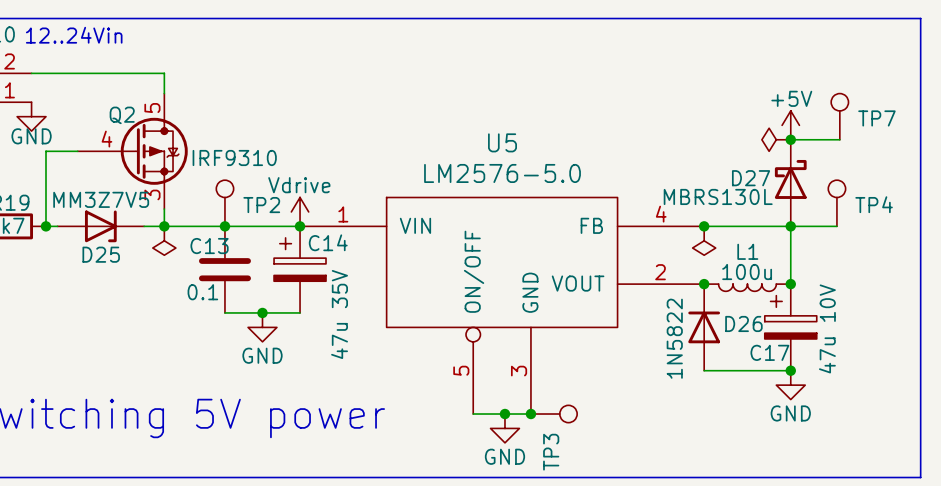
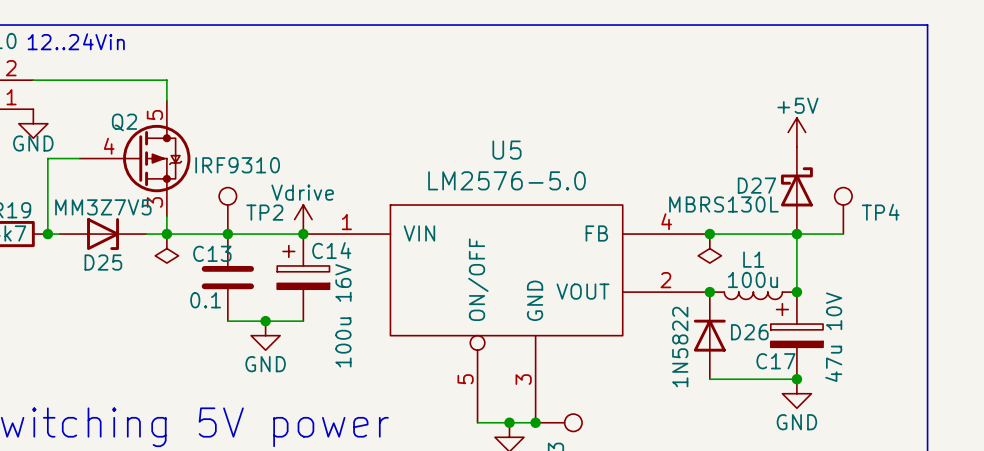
TP7: (839, 116) -> none
power symbol: (776, 139) -> none
wire: (790, 139) (839, 139) -> none
junction: (790, 139) -> none
C14 value: 47u 35V (339, 314) -> 100u 16V (343, 315)

